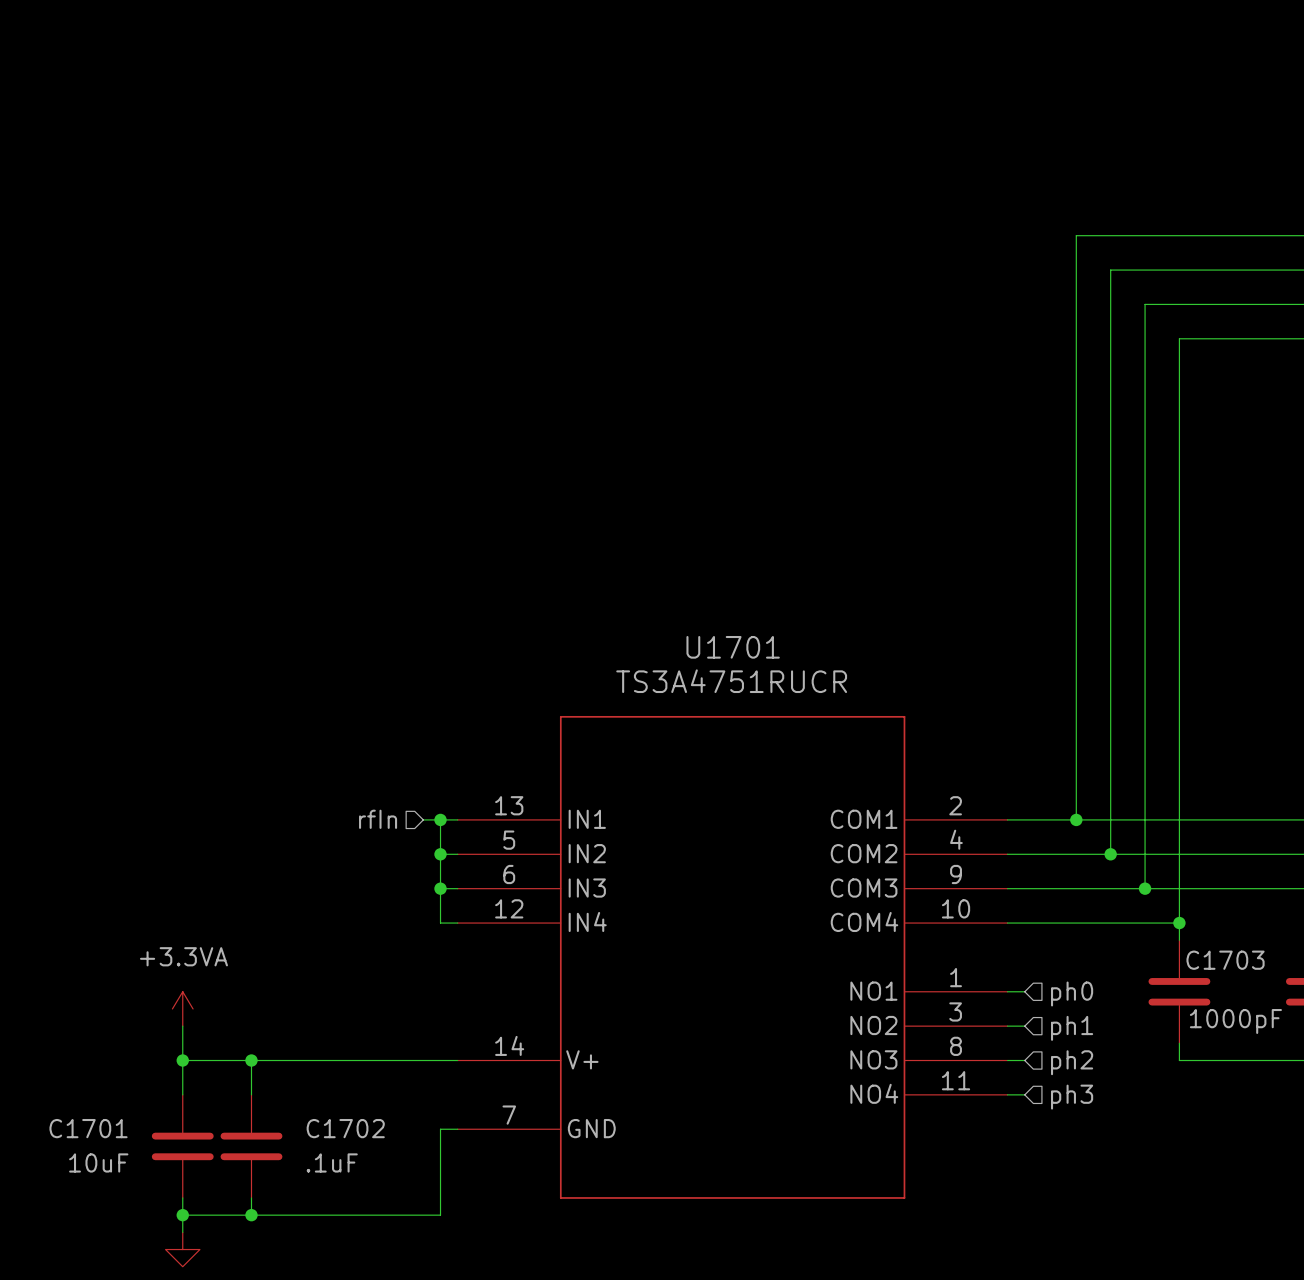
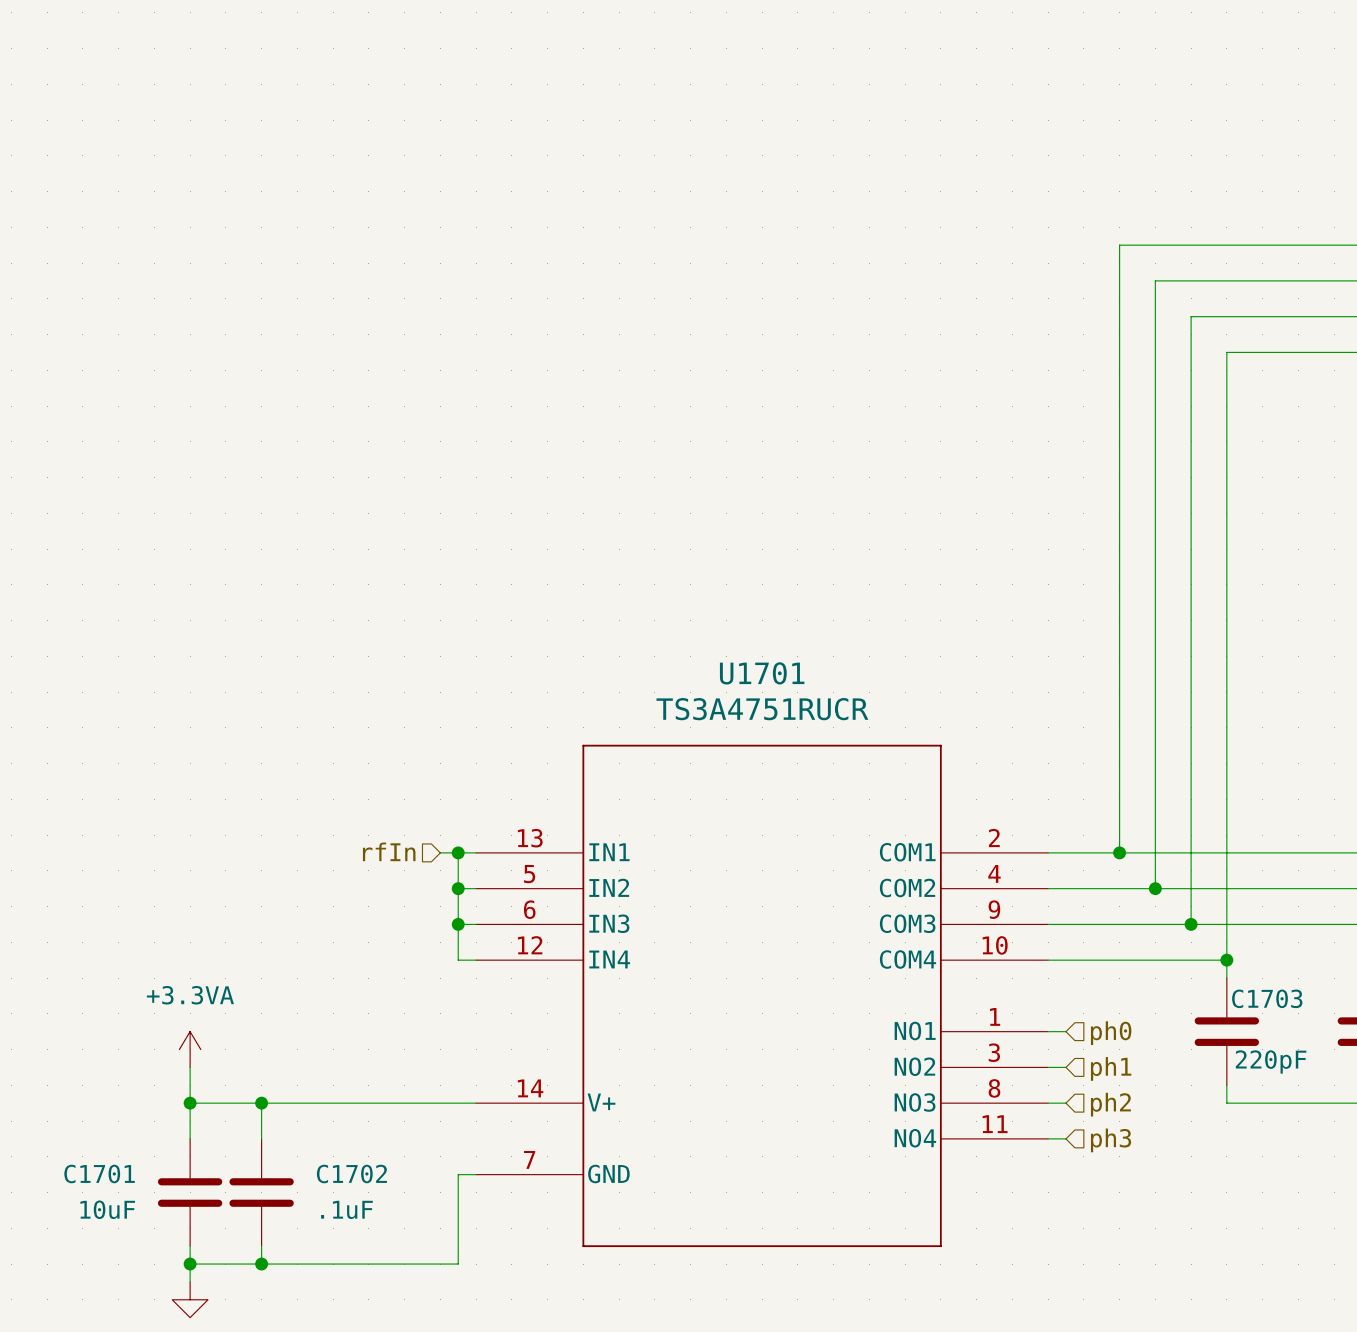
C1703 value: 1000pF (1235, 1021) -> 220pF (1271, 1061)

